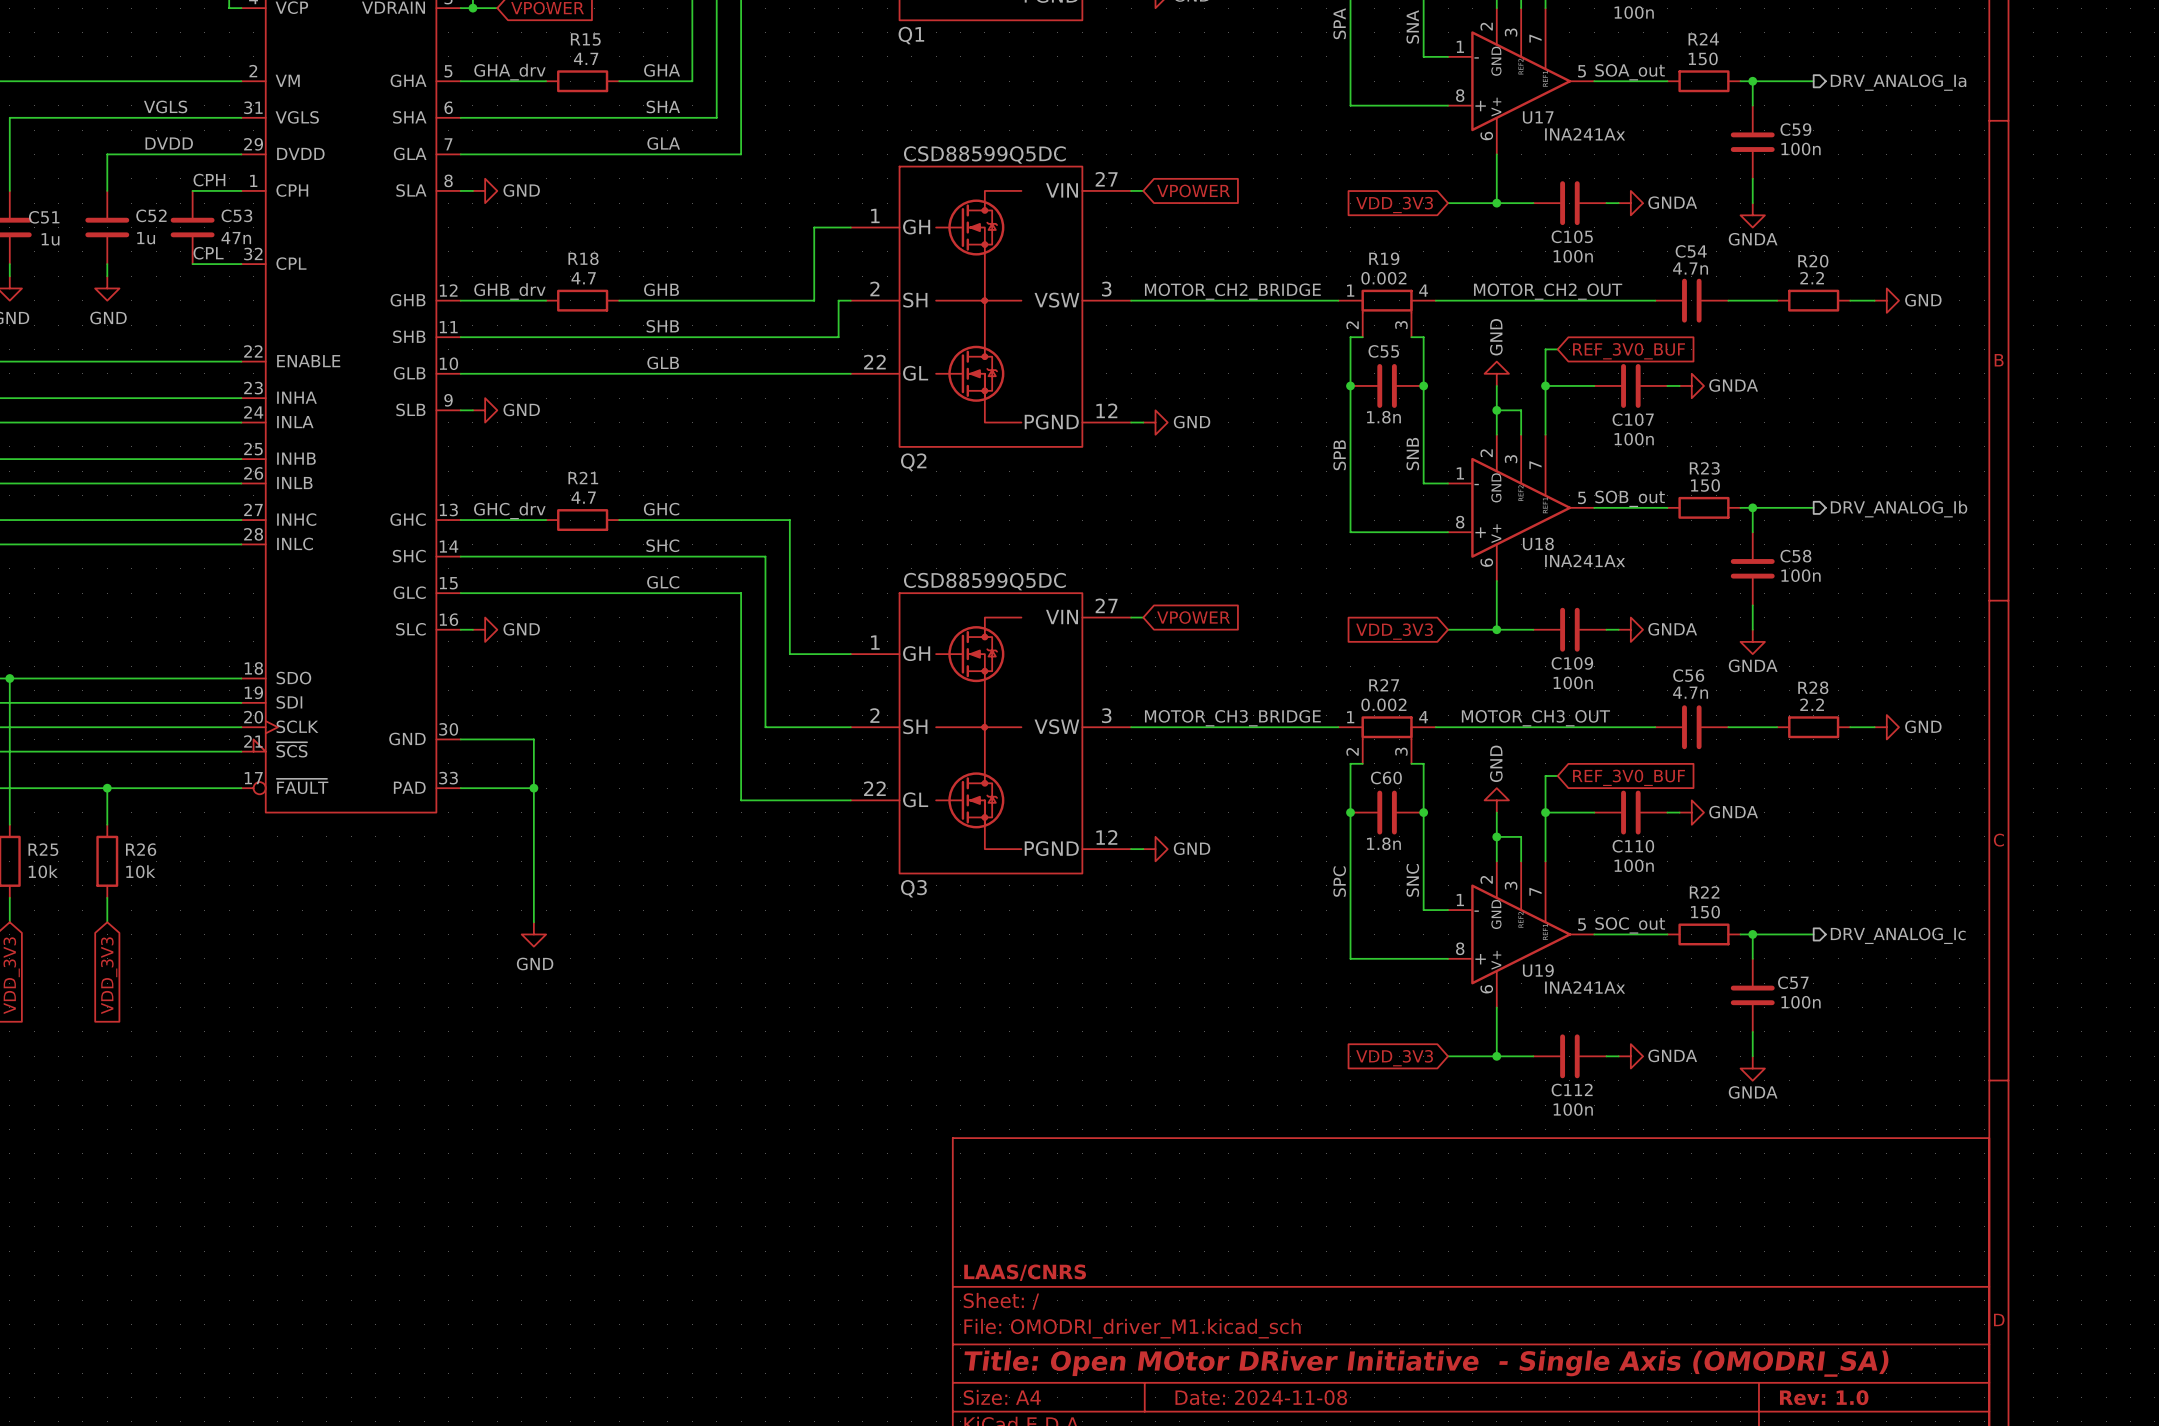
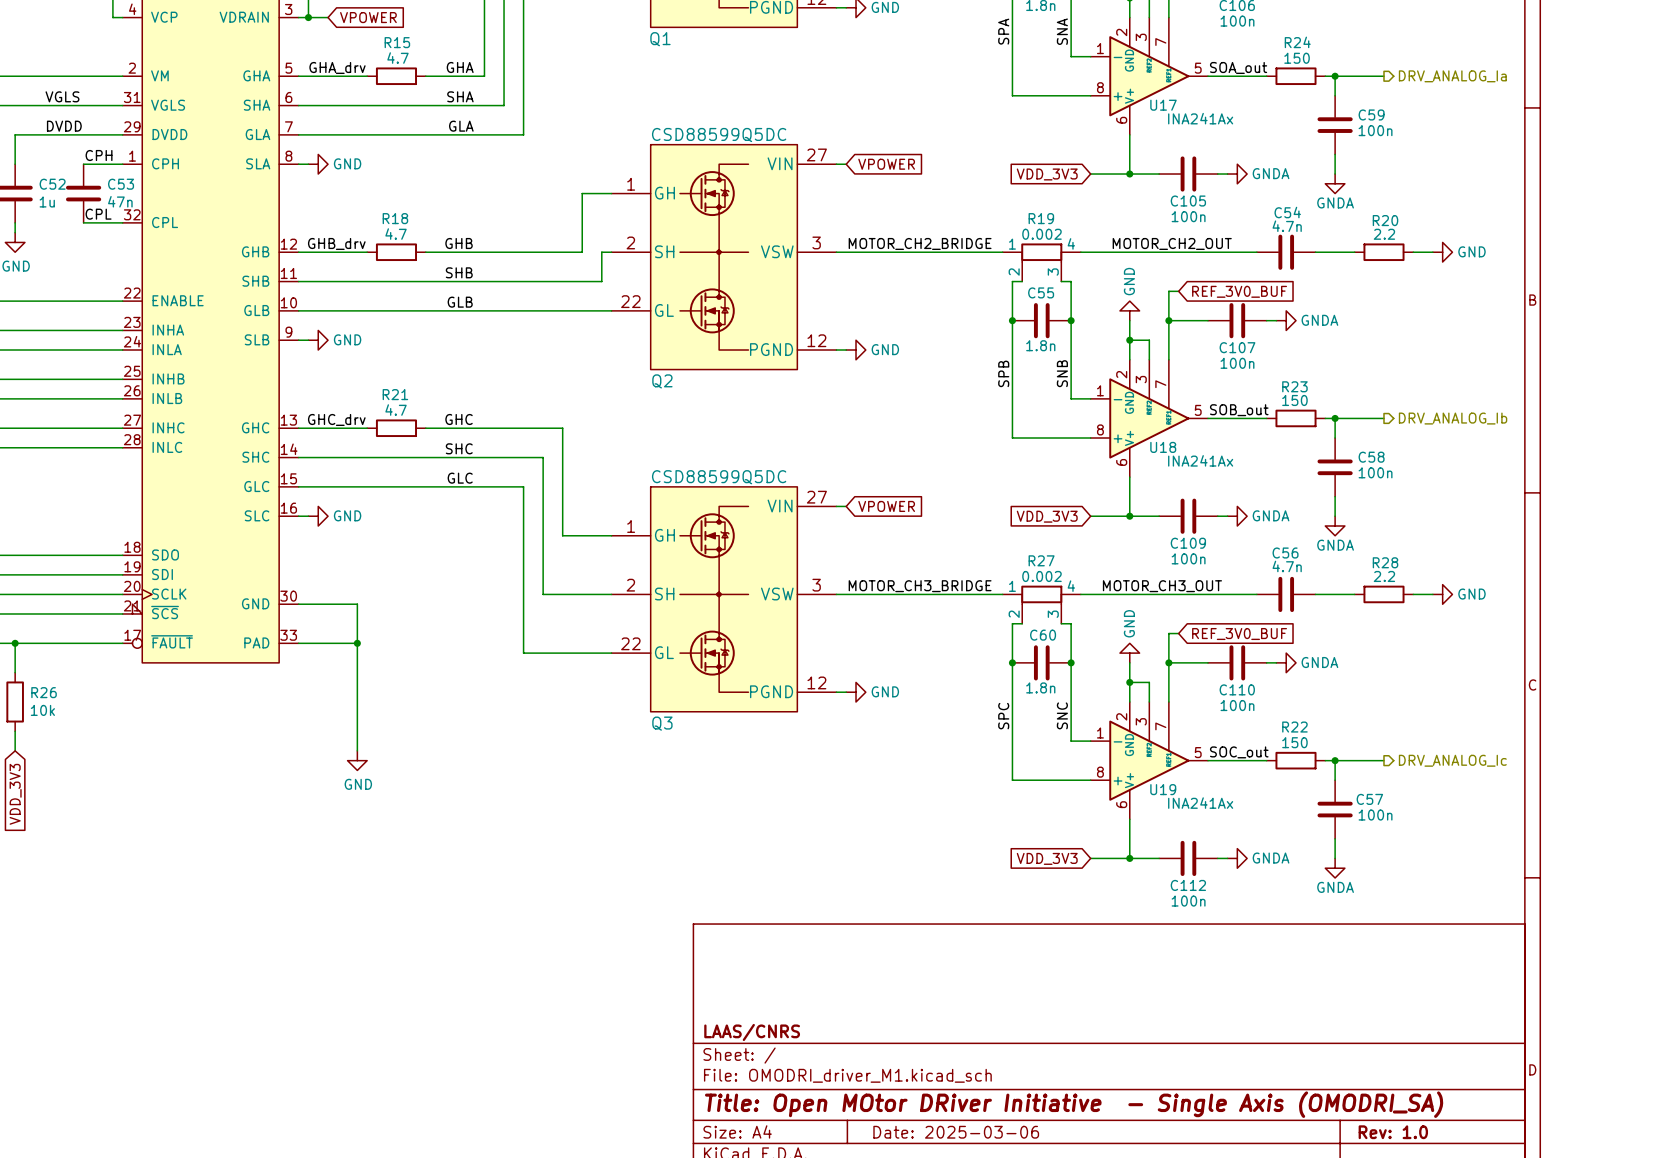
title block: Date: 2024-11-08 (1261, 1397) -> Date: 2025-03-06 (956, 1132)

